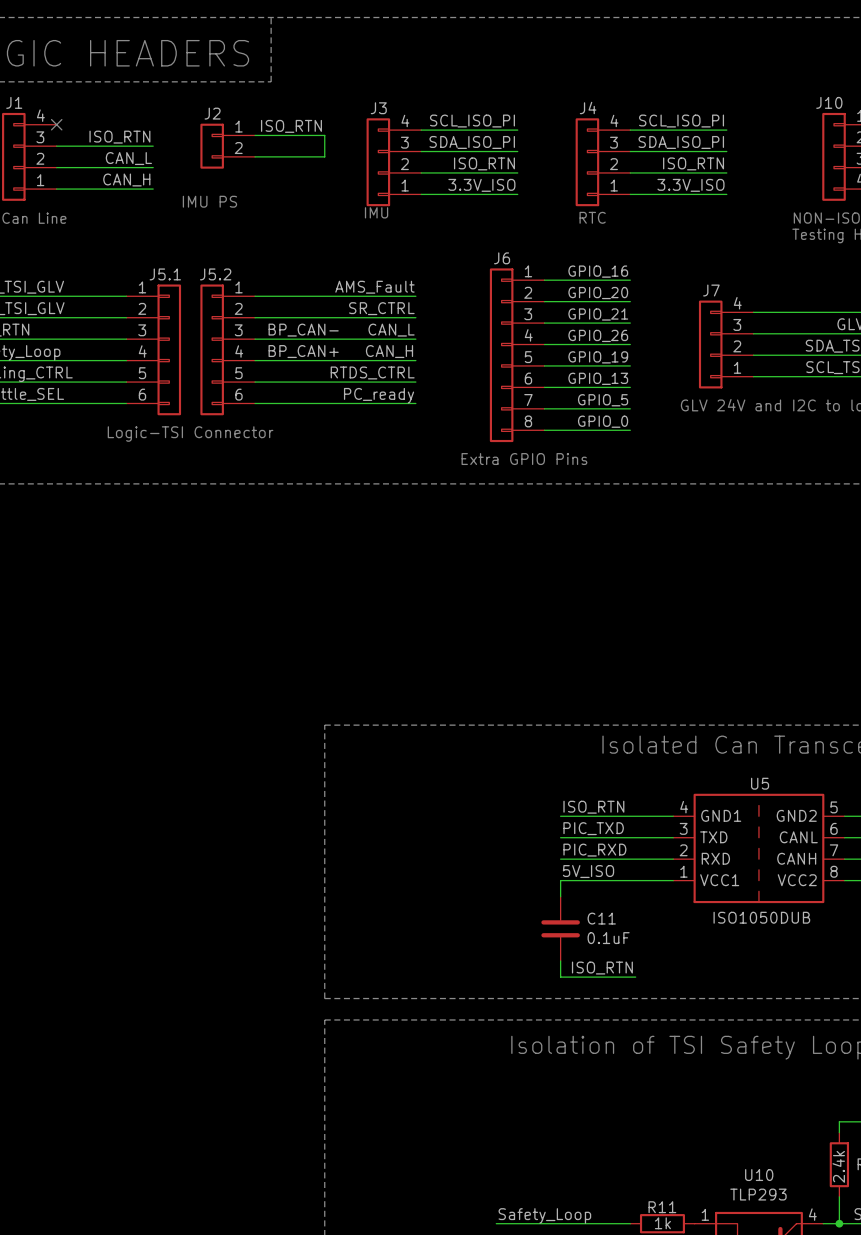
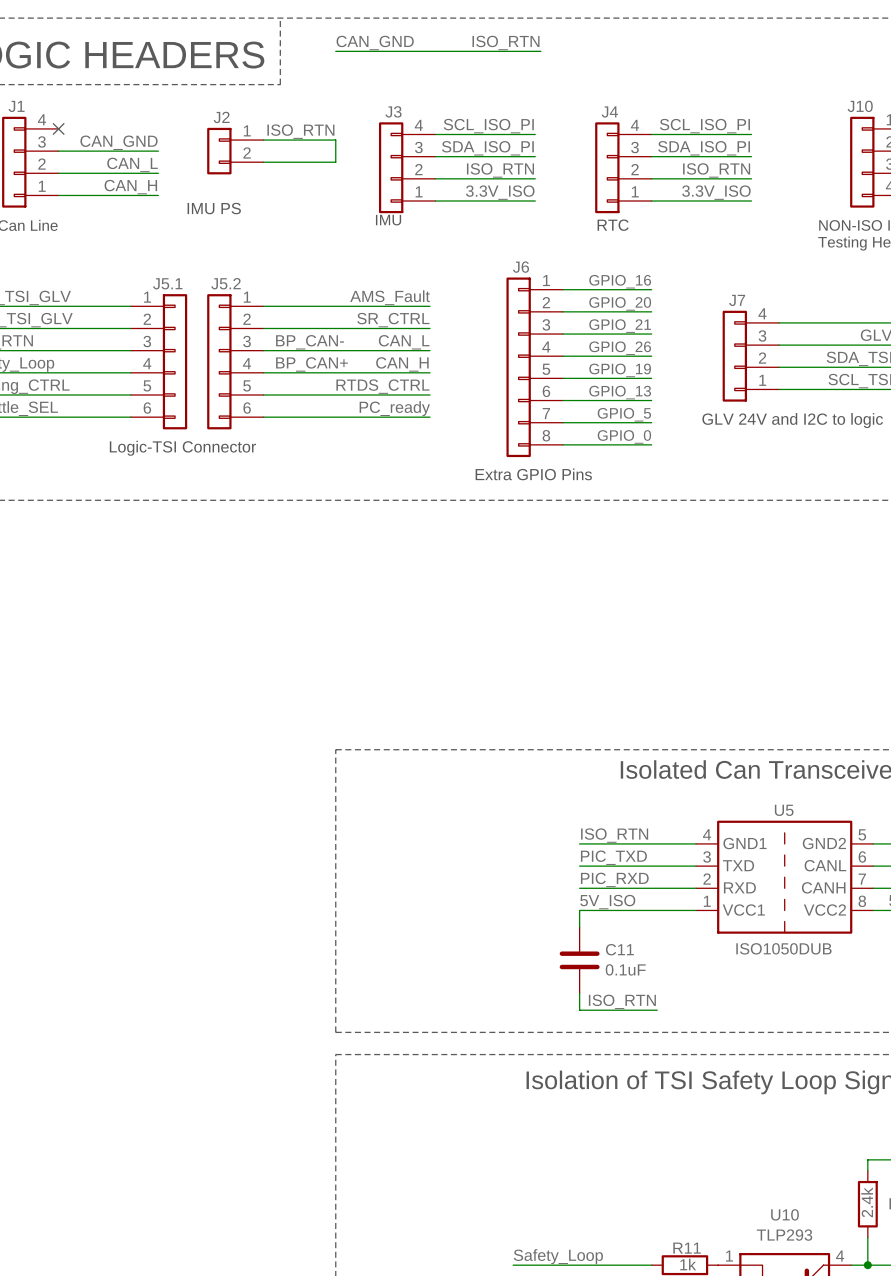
label: none -> CAN_GND (375, 42)
label: none -> ISO_RTN (506, 42)
wire: none -> (335, 51) (540, 51)
label: ISO_RTN (119, 137) -> CAN_GND (119, 142)

